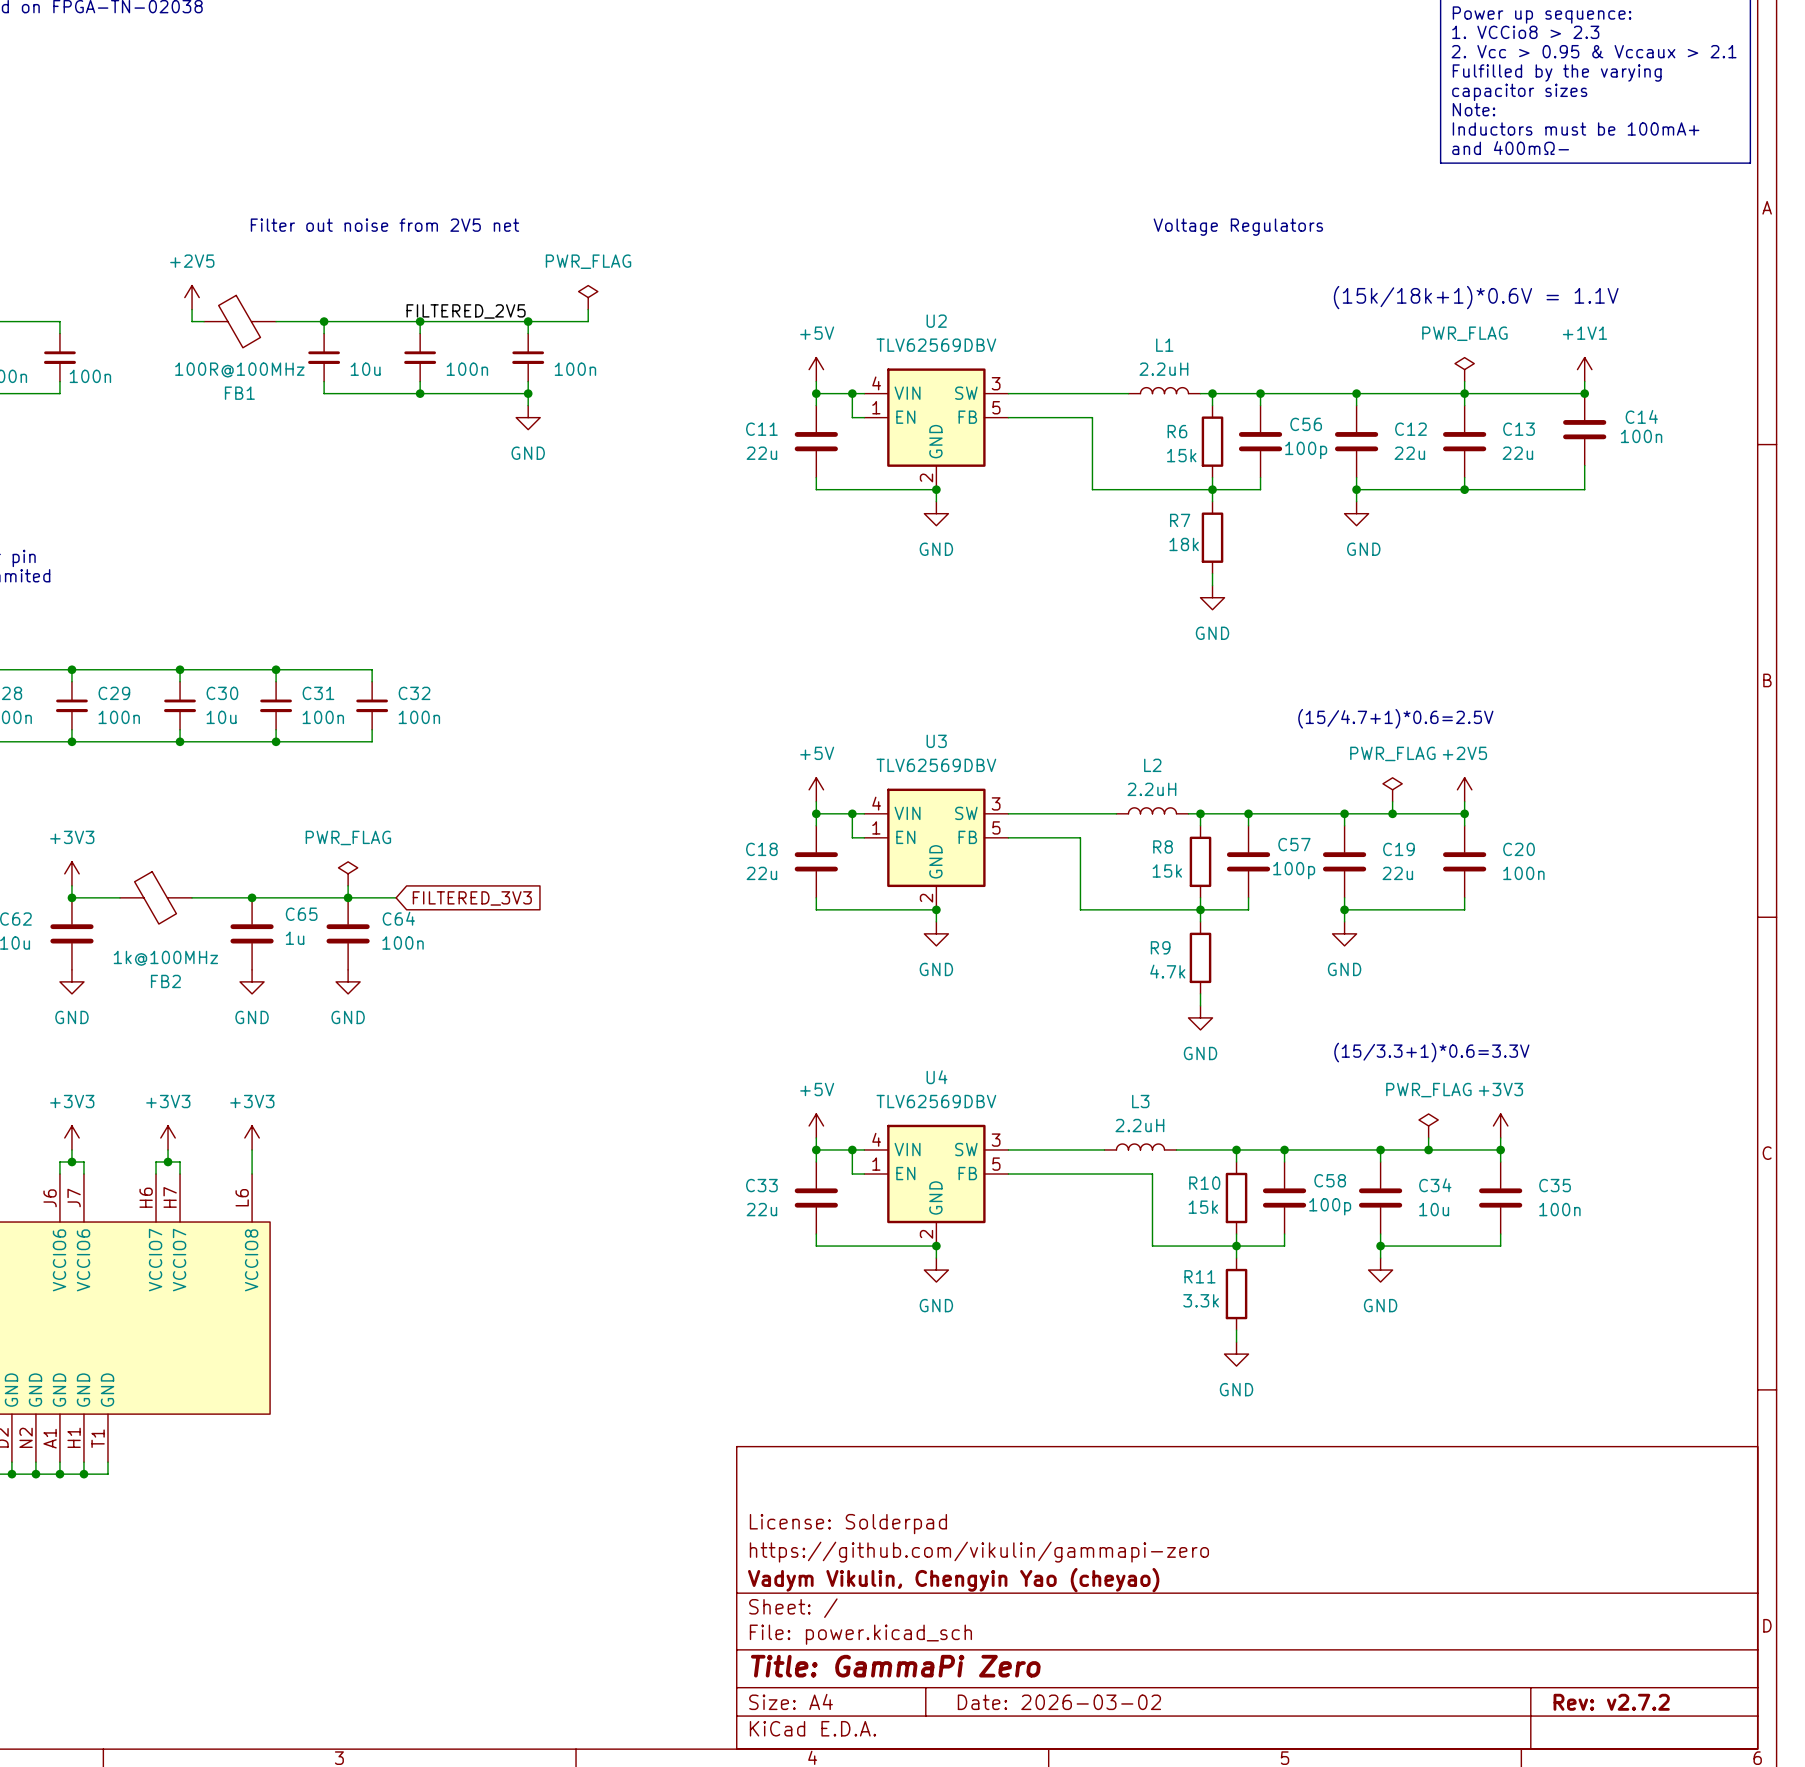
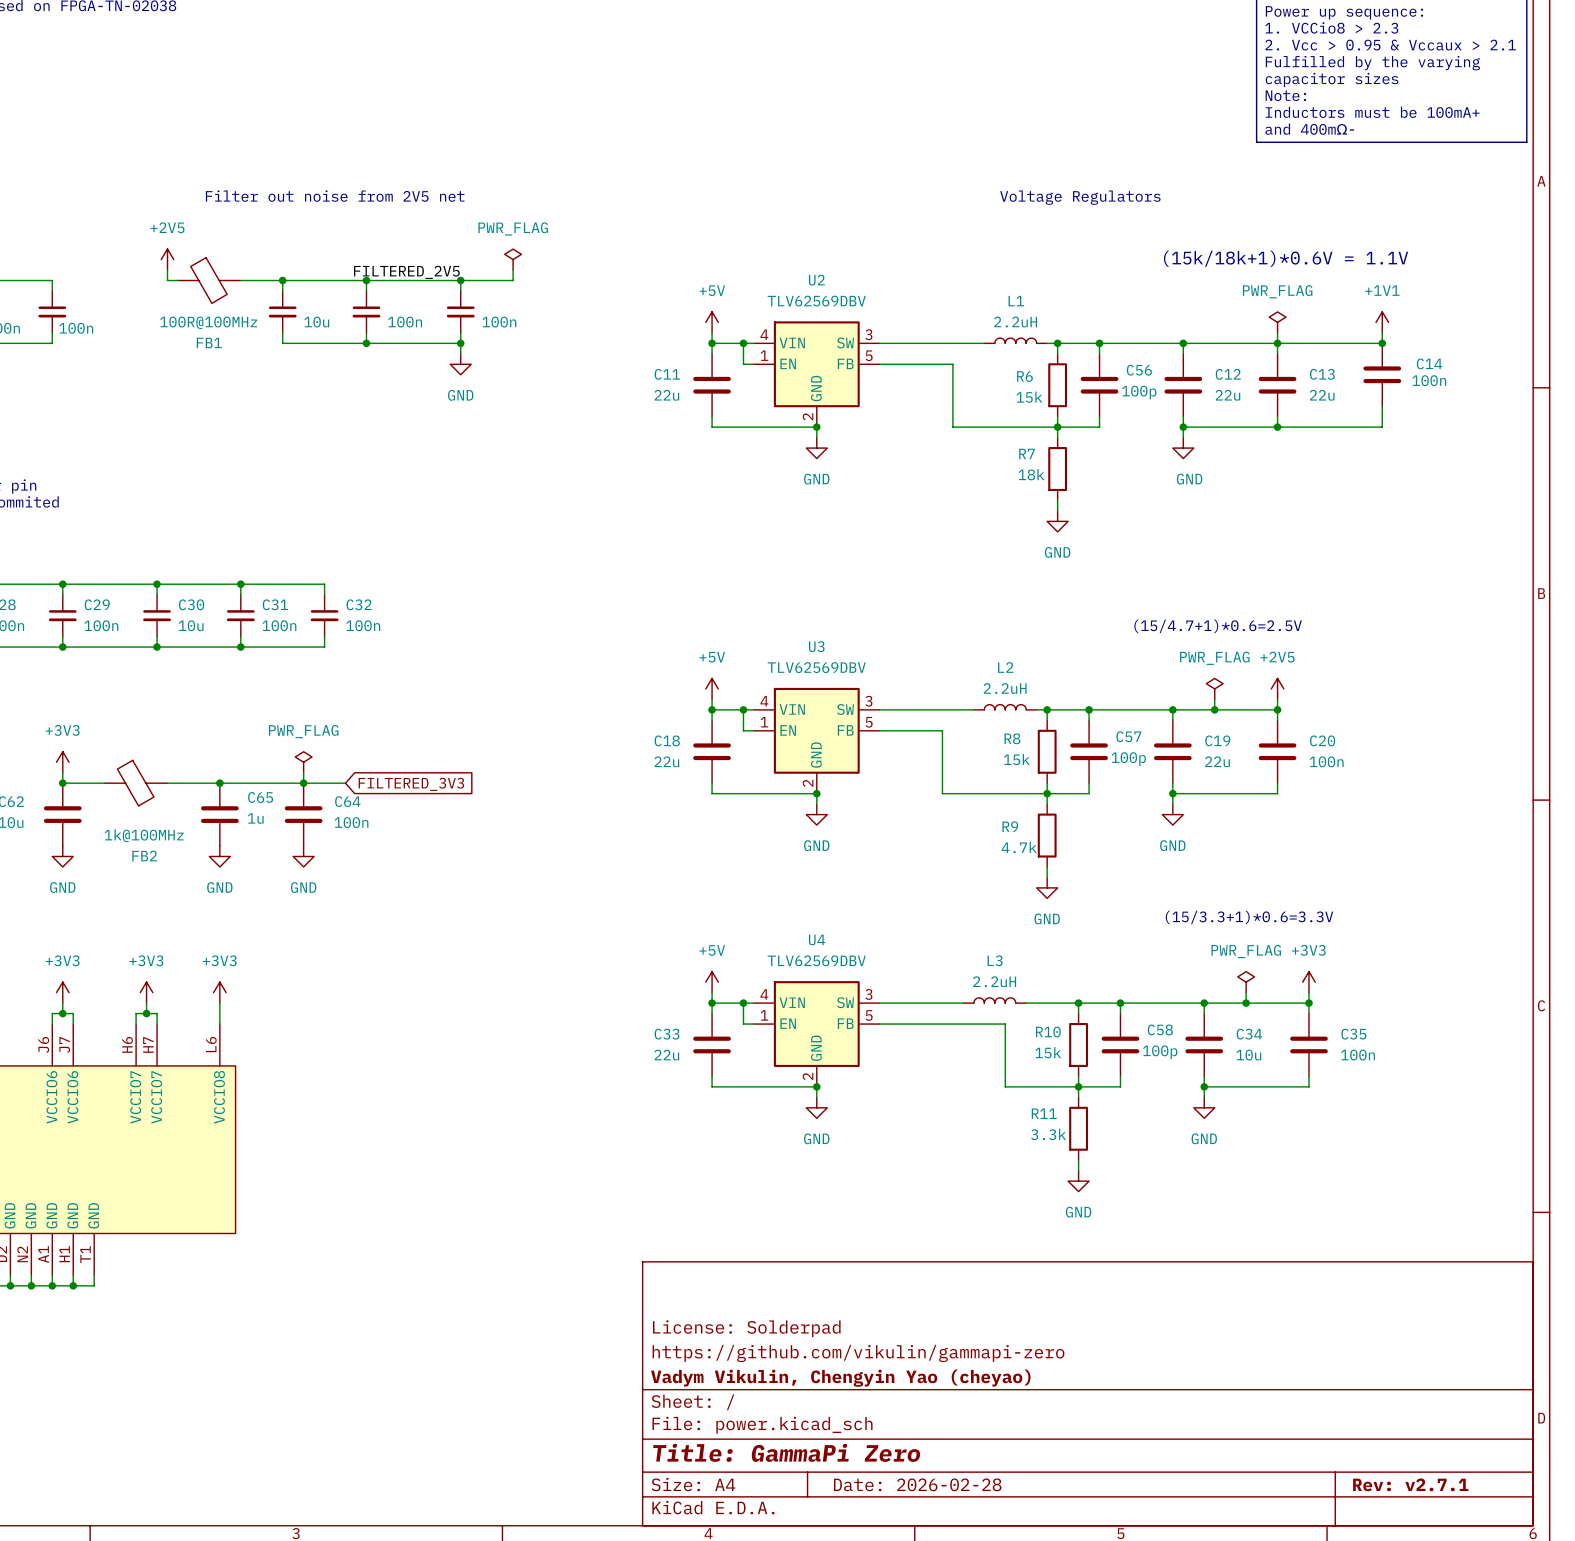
title block: Date: 2026-03-02 (1059, 1702) -> Date: 2026-02-28 (917, 1484)
title block: Rev: v2.7.2 (1611, 1702) -> Rev: v2.7.1 (1410, 1484)

